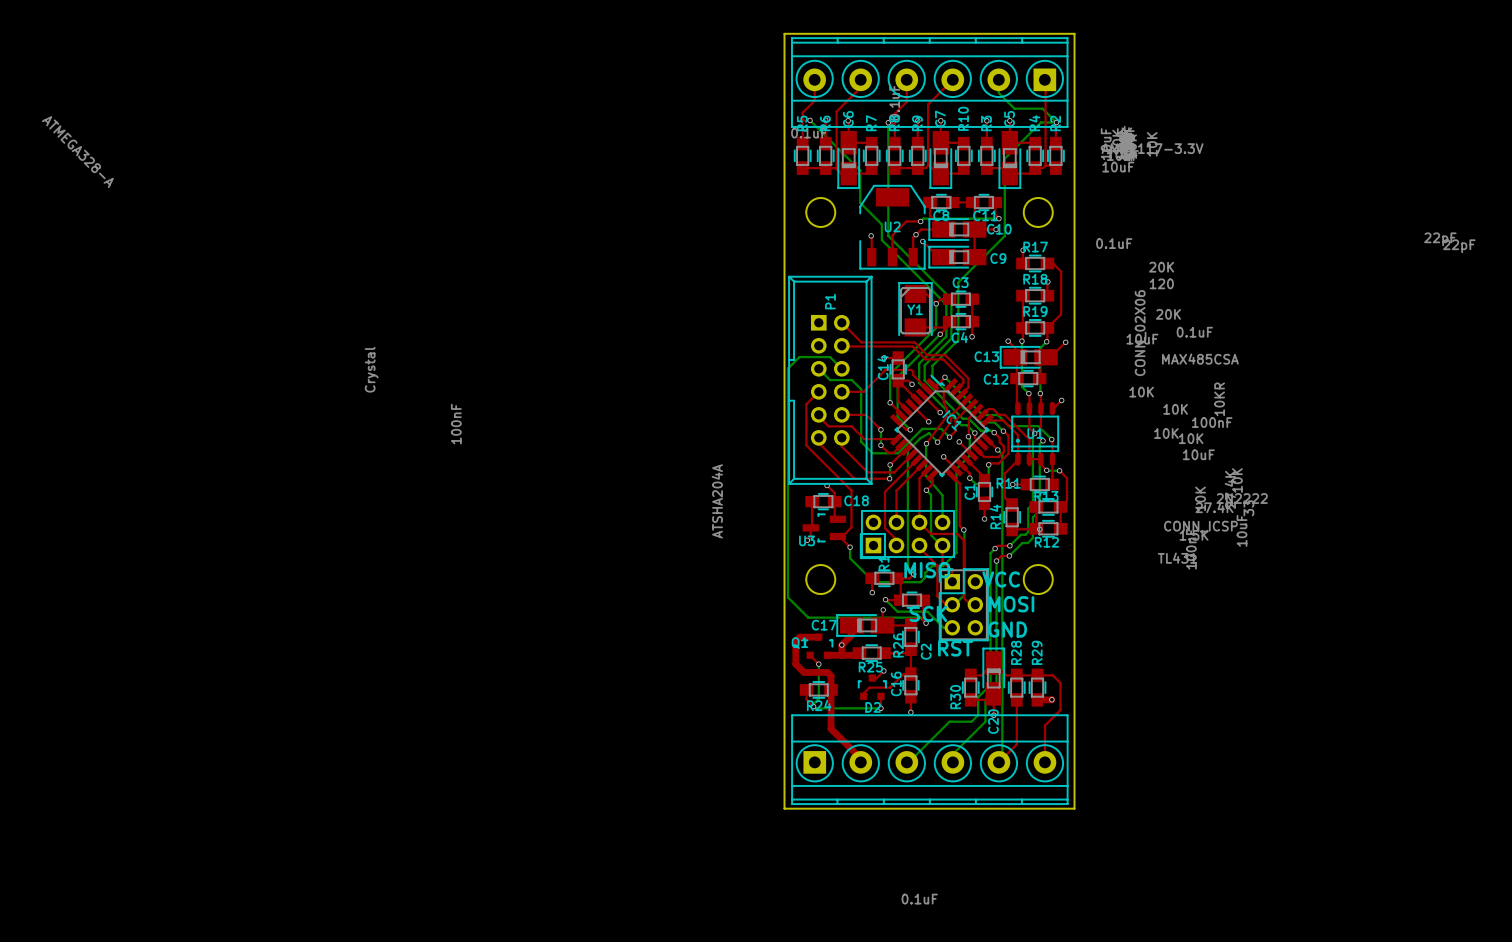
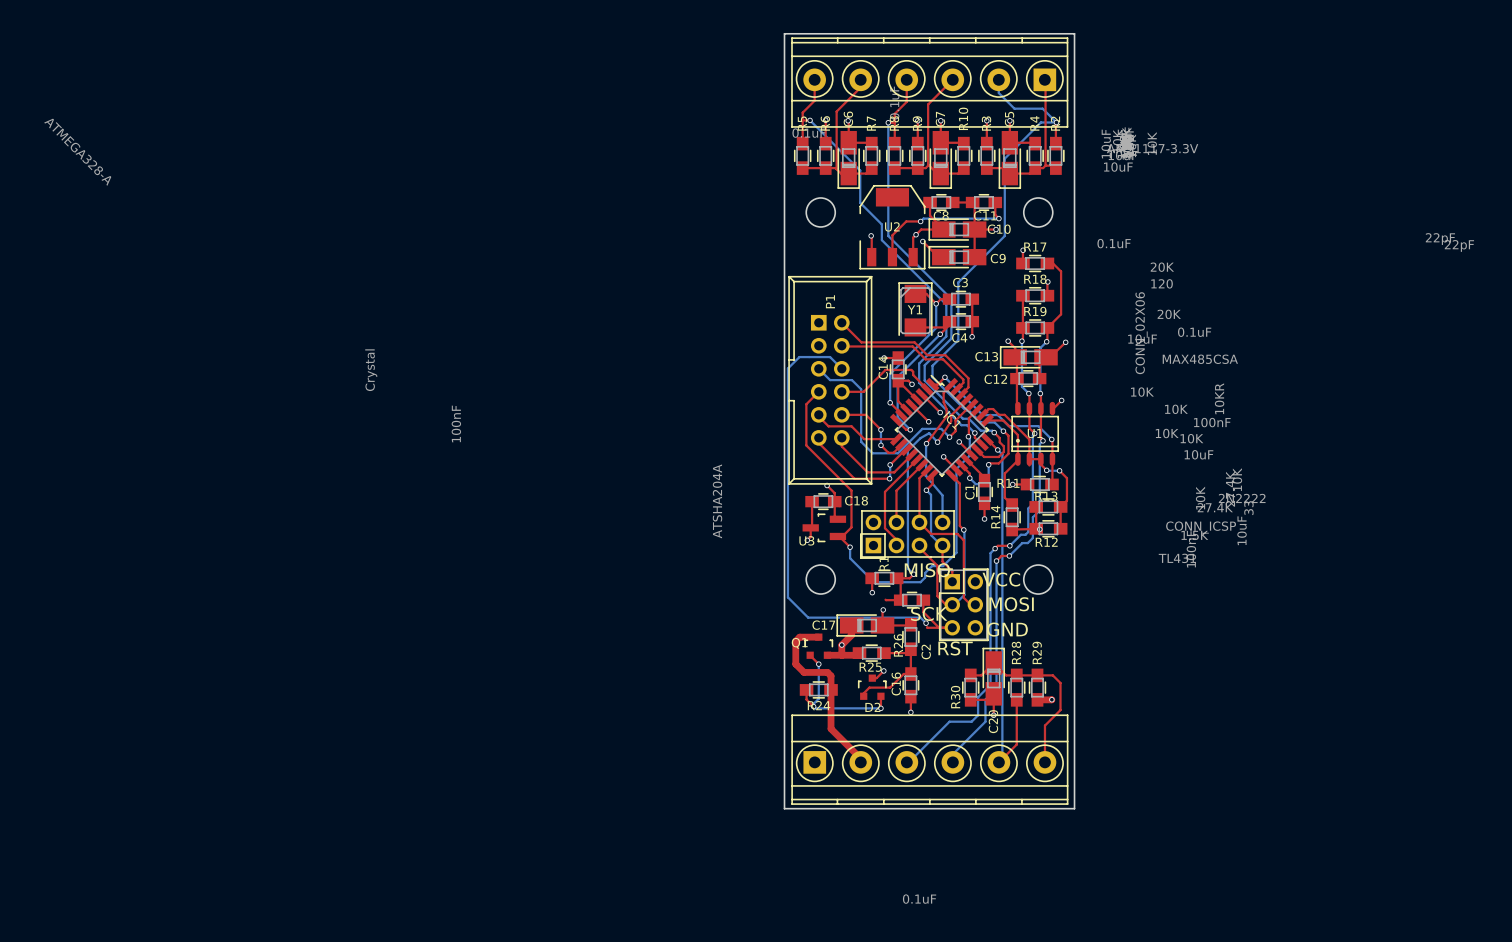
bottom track: (885, 599) (897, 611) (927, 611) (943, 627) (952, 627) -> none
via: (885, 599) -> none
top track: (923, 612) (923, 620) (926, 623) -> (923, 612) (939, 627)
top track: none -> (926, 627) (952, 627)

